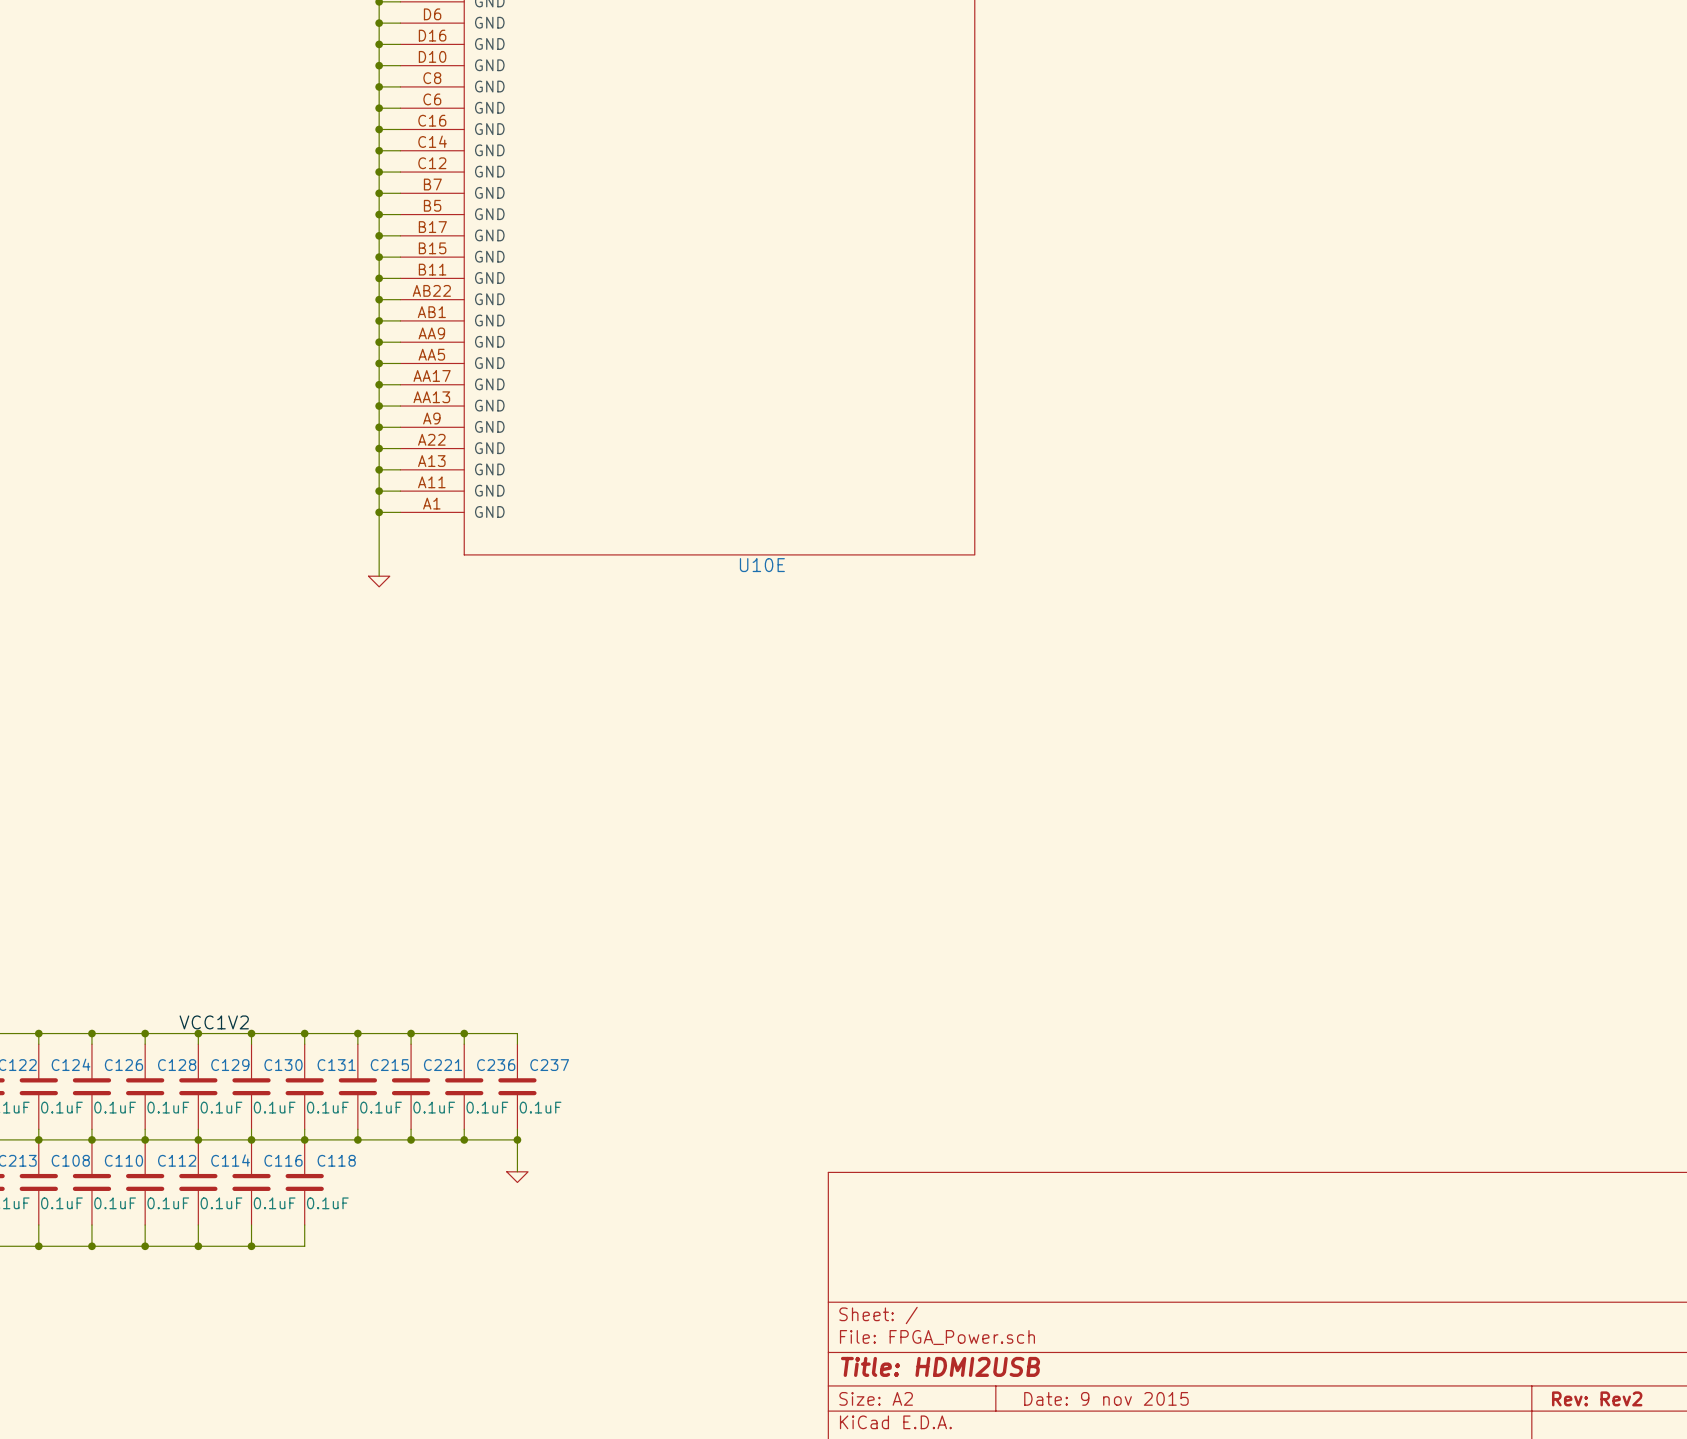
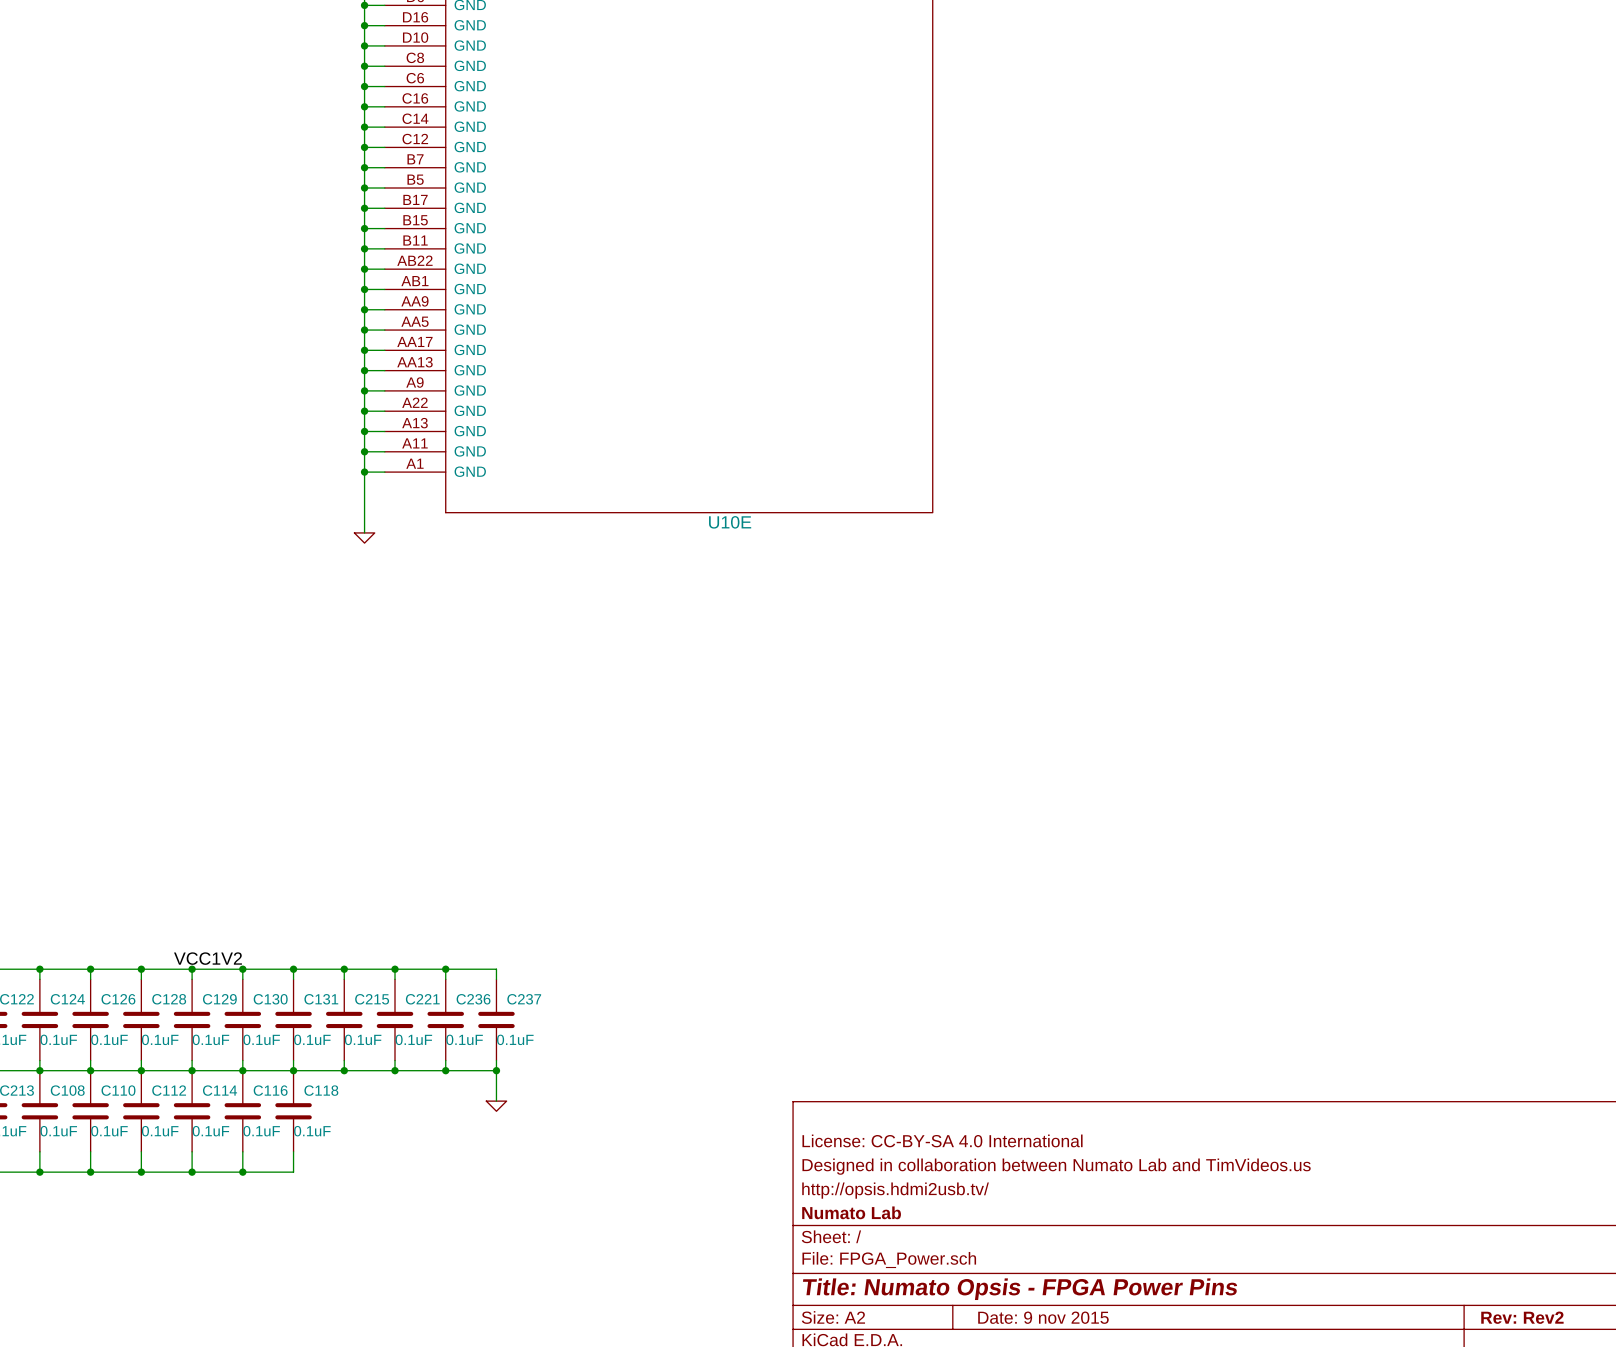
title block: none -> License: CC-BY-SA 4.0 International (942, 1140)
title block: none -> Designed in collaboration between Numato Lab and TimVideos.us (1056, 1166)
title block: none -> http://opsis.hdmi2usb.tv/ (895, 1190)
title block: none -> Numato Lab (851, 1212)
title block: Title: HDMI2USB (940, 1366) -> Title: Numato Opsis - FPGA Power Pins (1020, 1289)

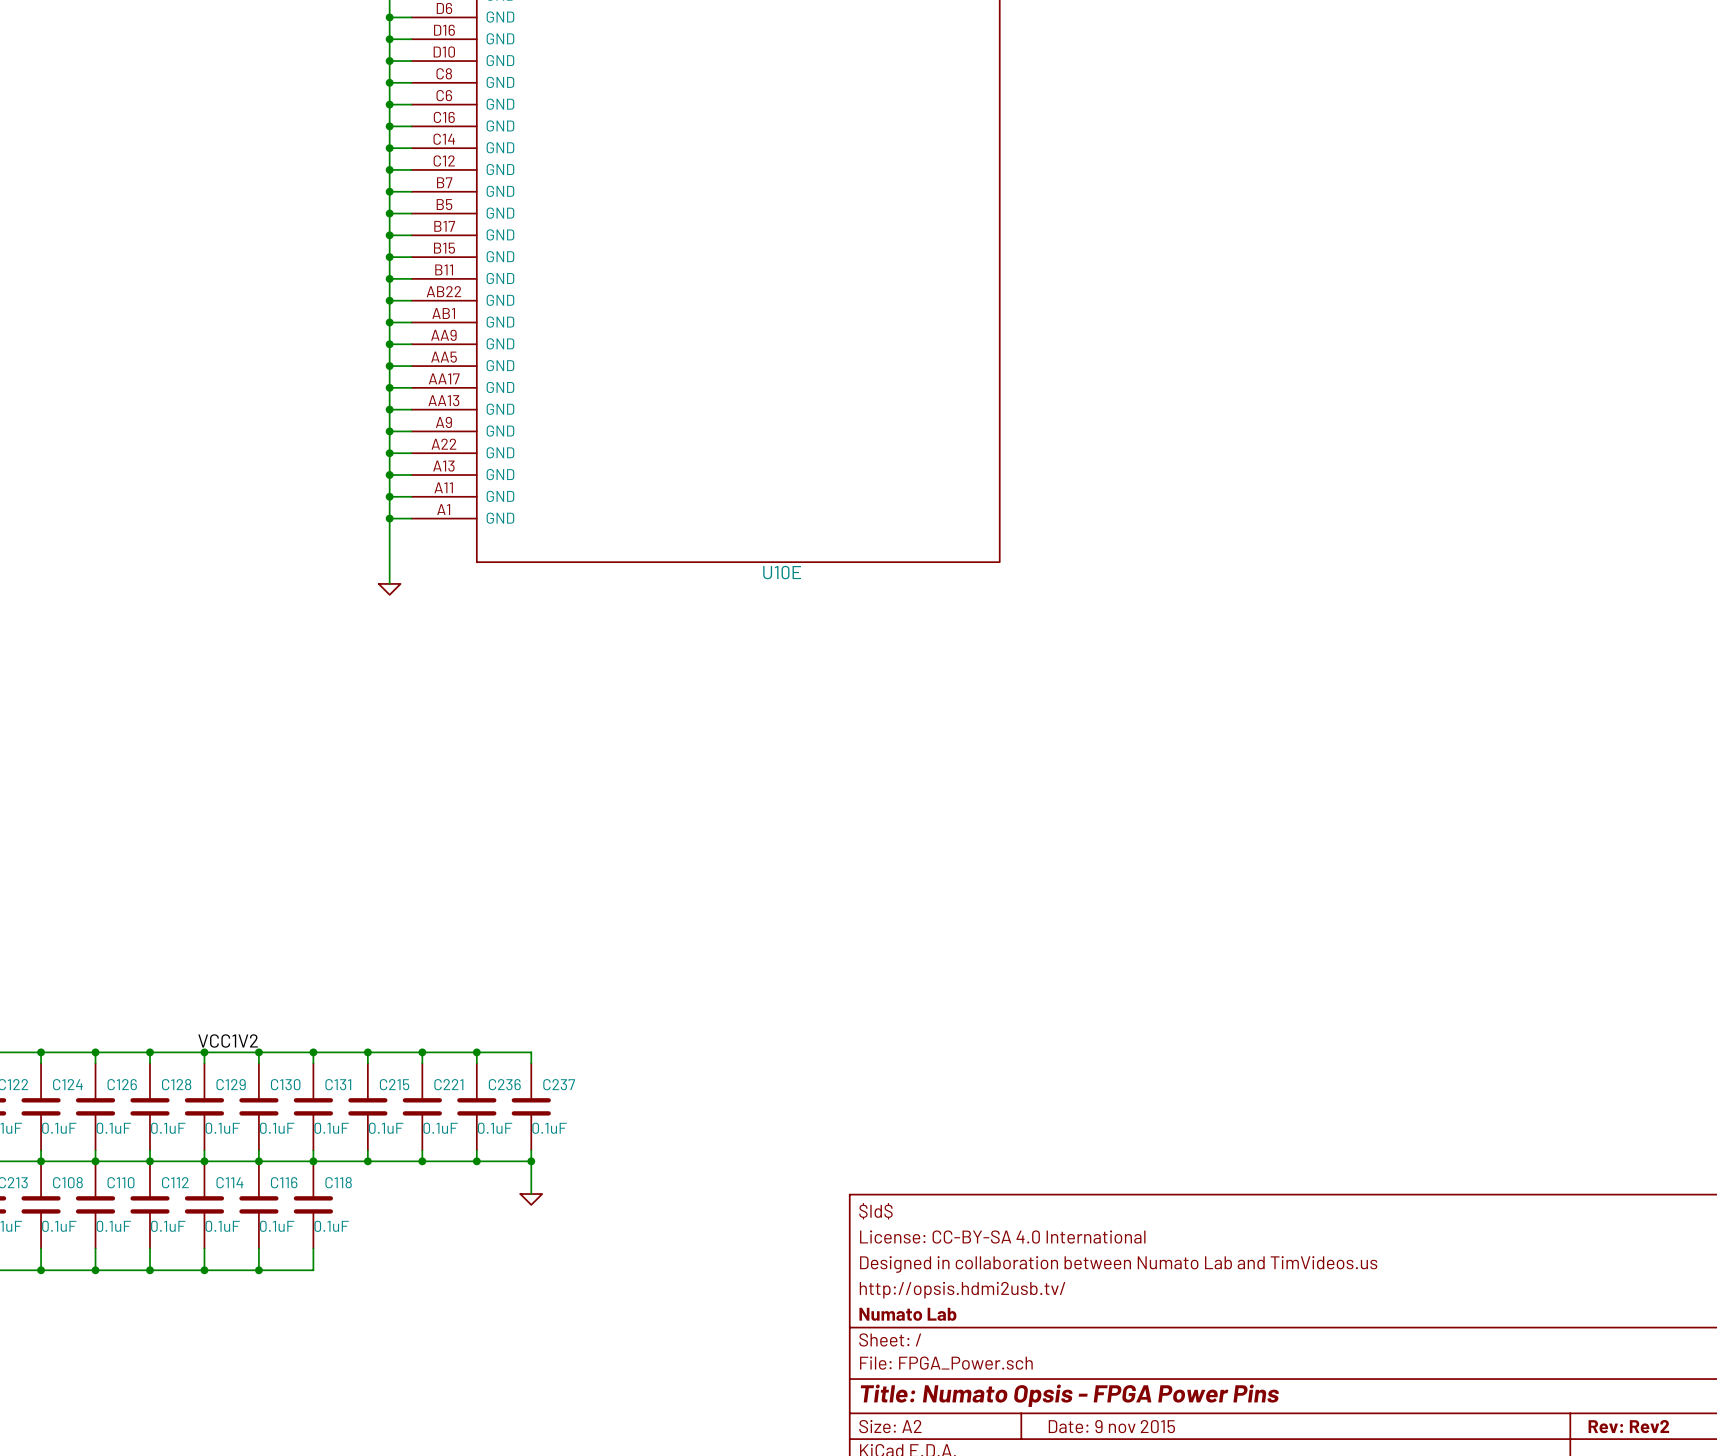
title block: none -> $Id$ (875, 1211)

